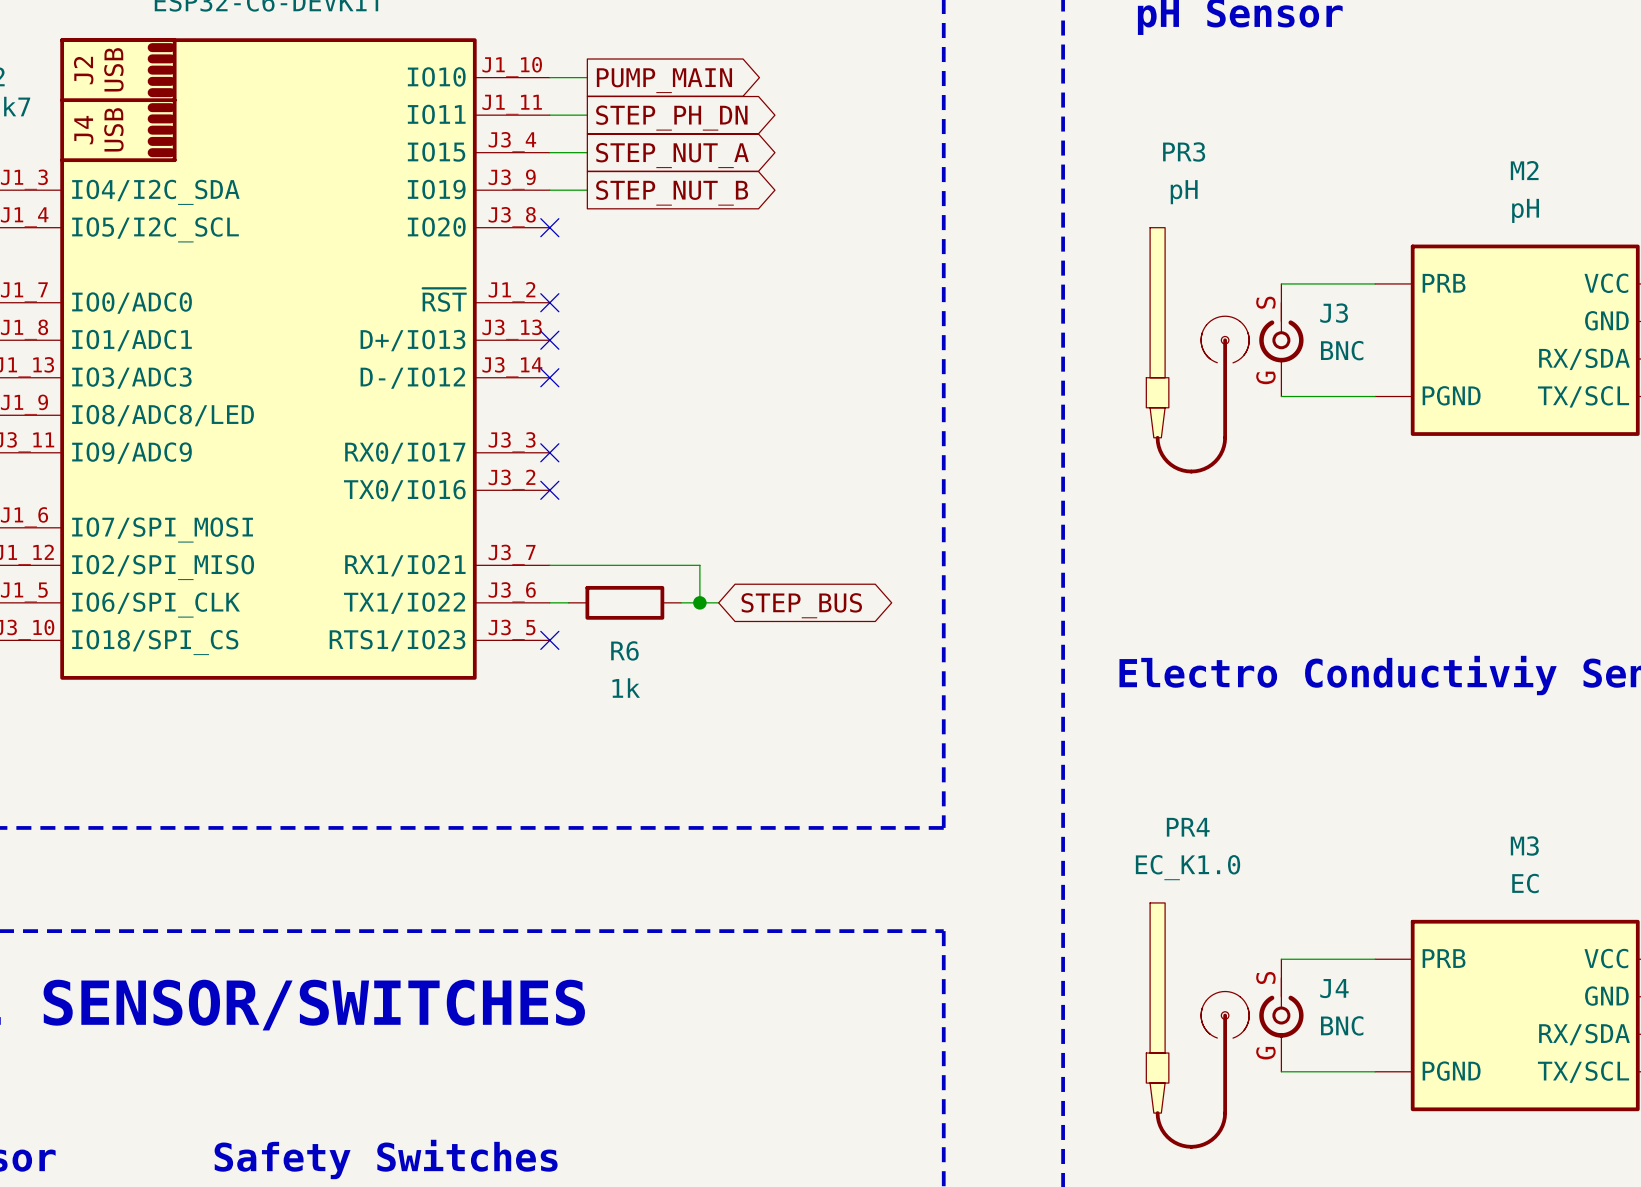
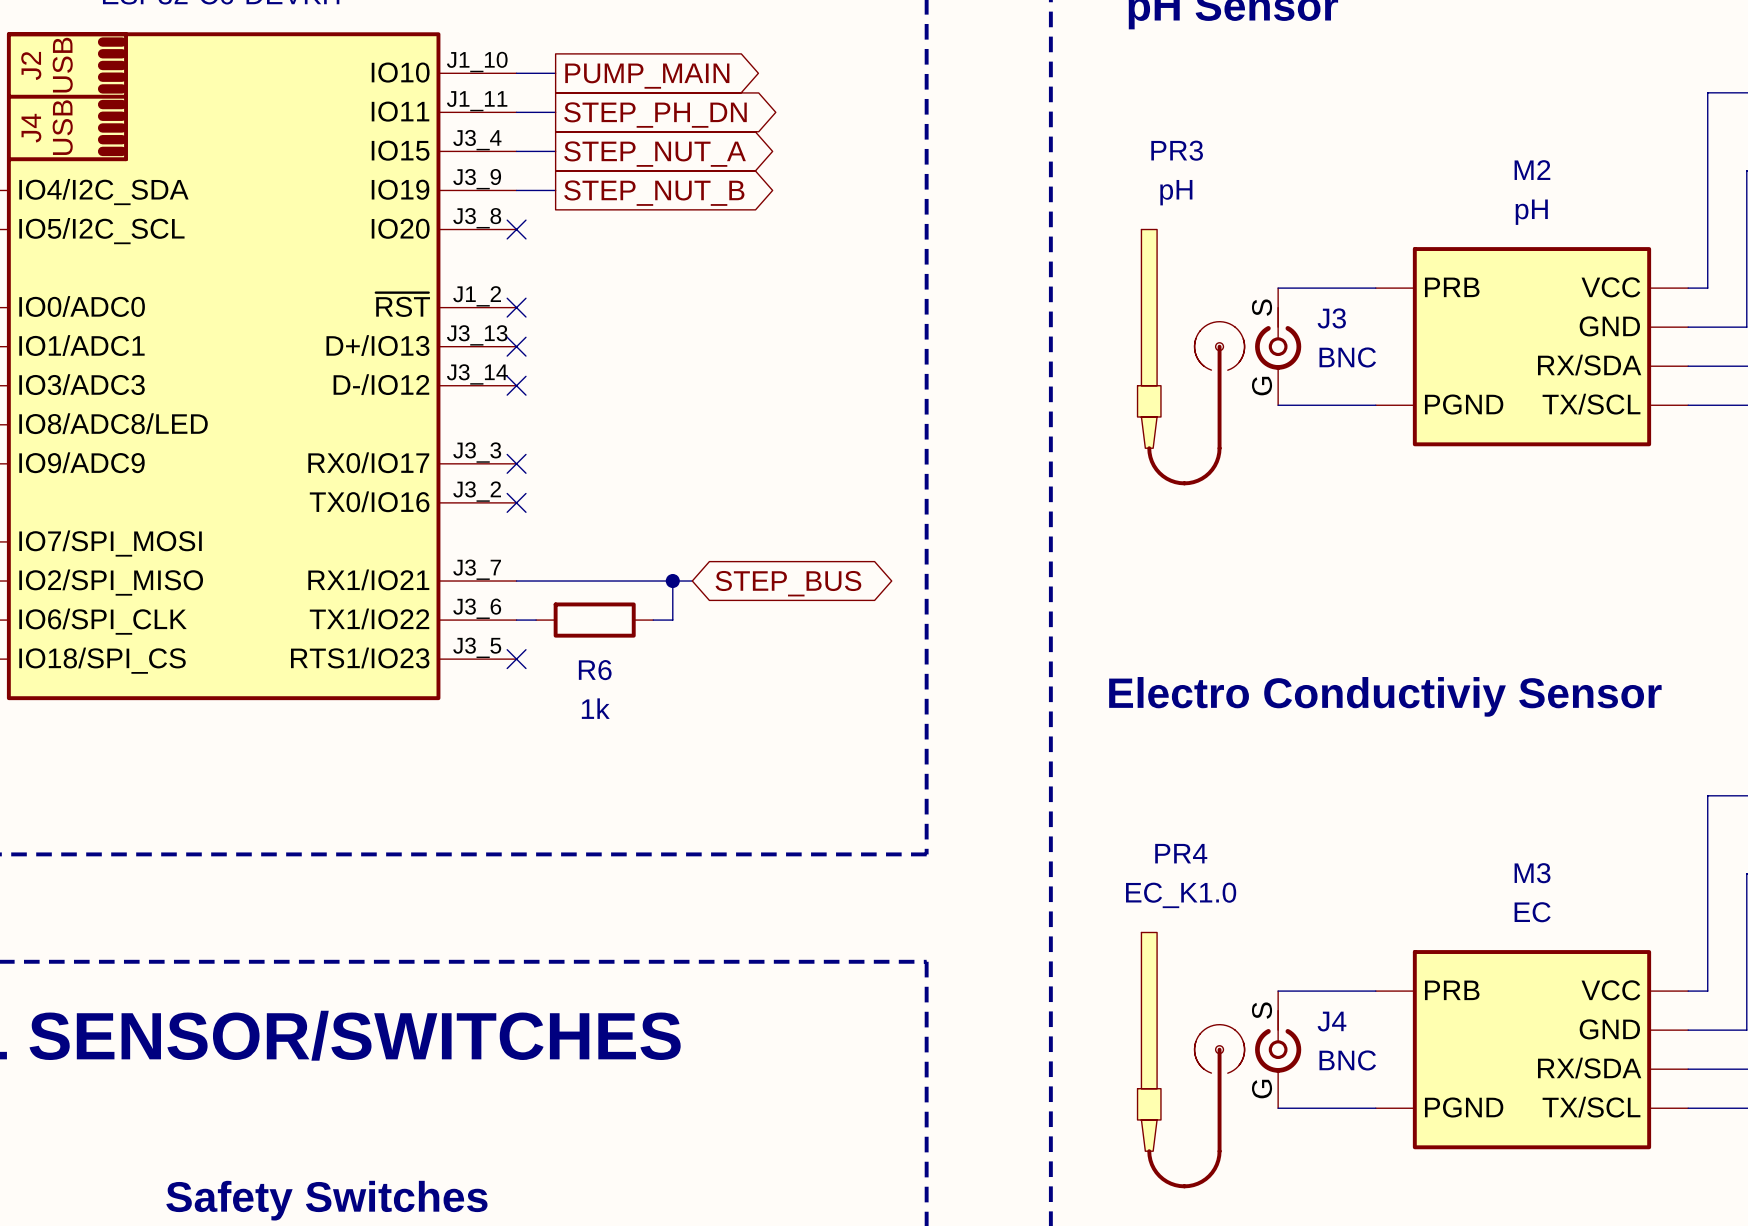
wire: (699, 602) (718, 602) -> (672, 581) (692, 581)
junction position: (699, 602) -> (672, 581)
global label position: STEP_BUS (801, 605) -> STEP_BUS (788, 583)

